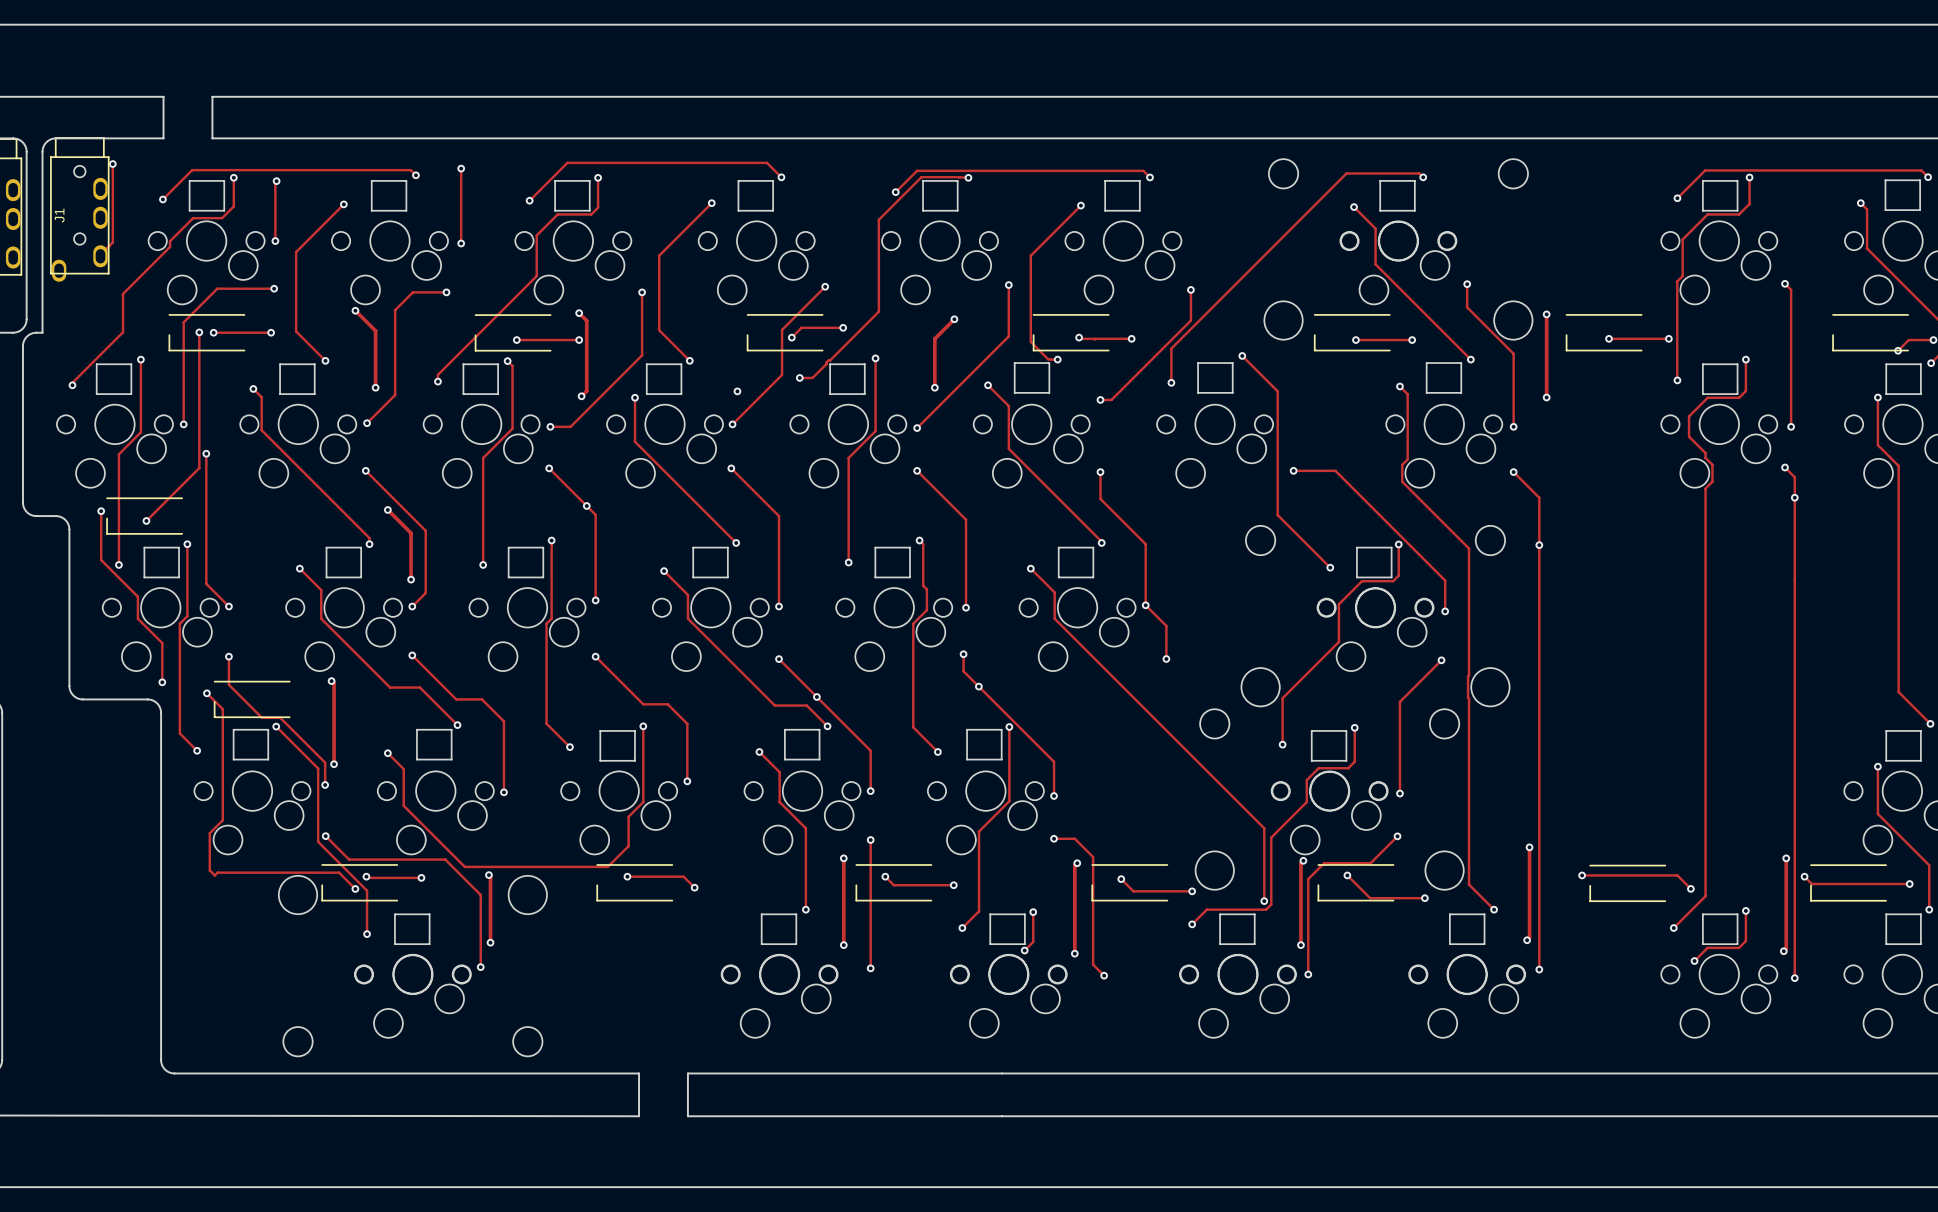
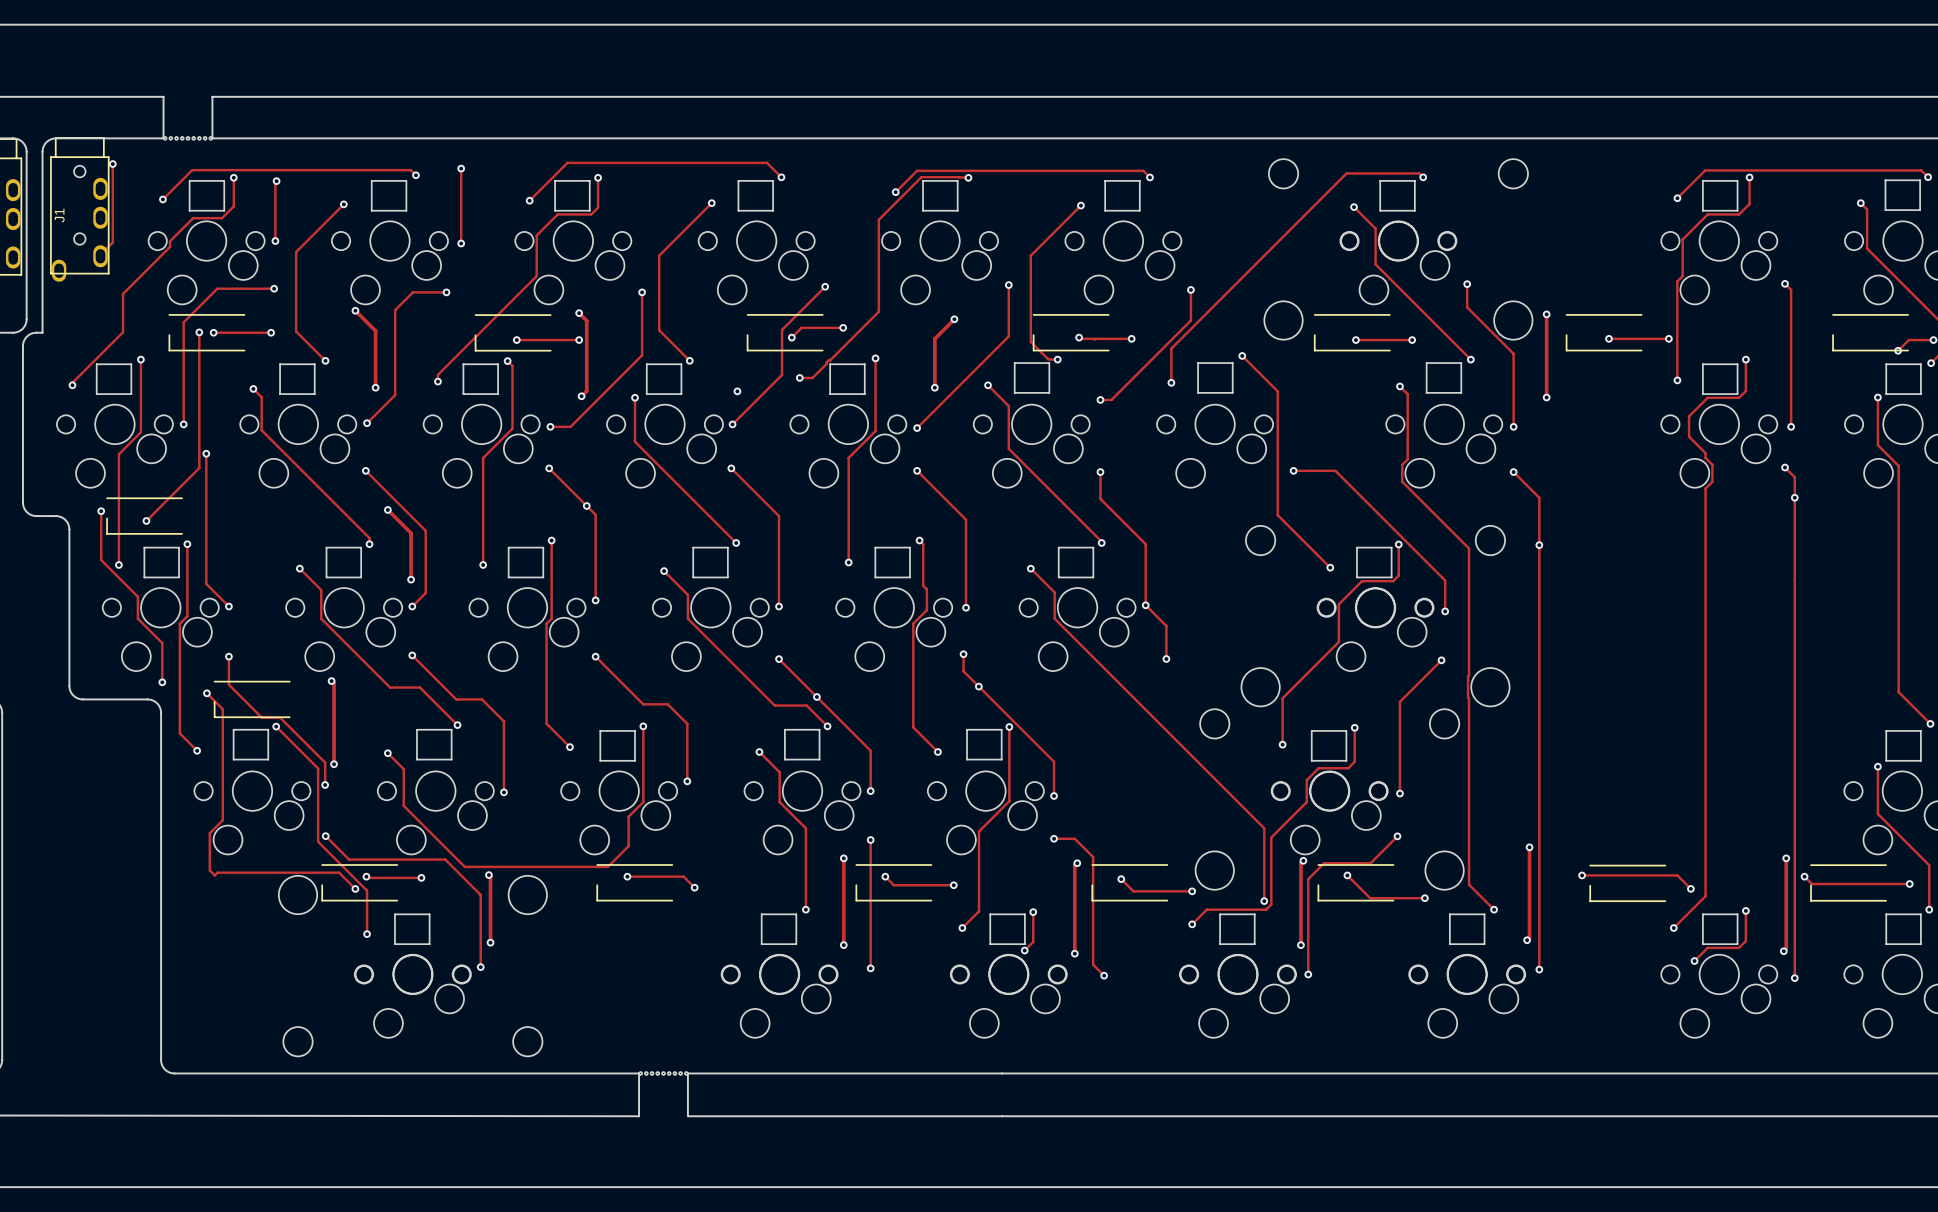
part: none -> (187, 138)
part: none -> (663, 1073)

